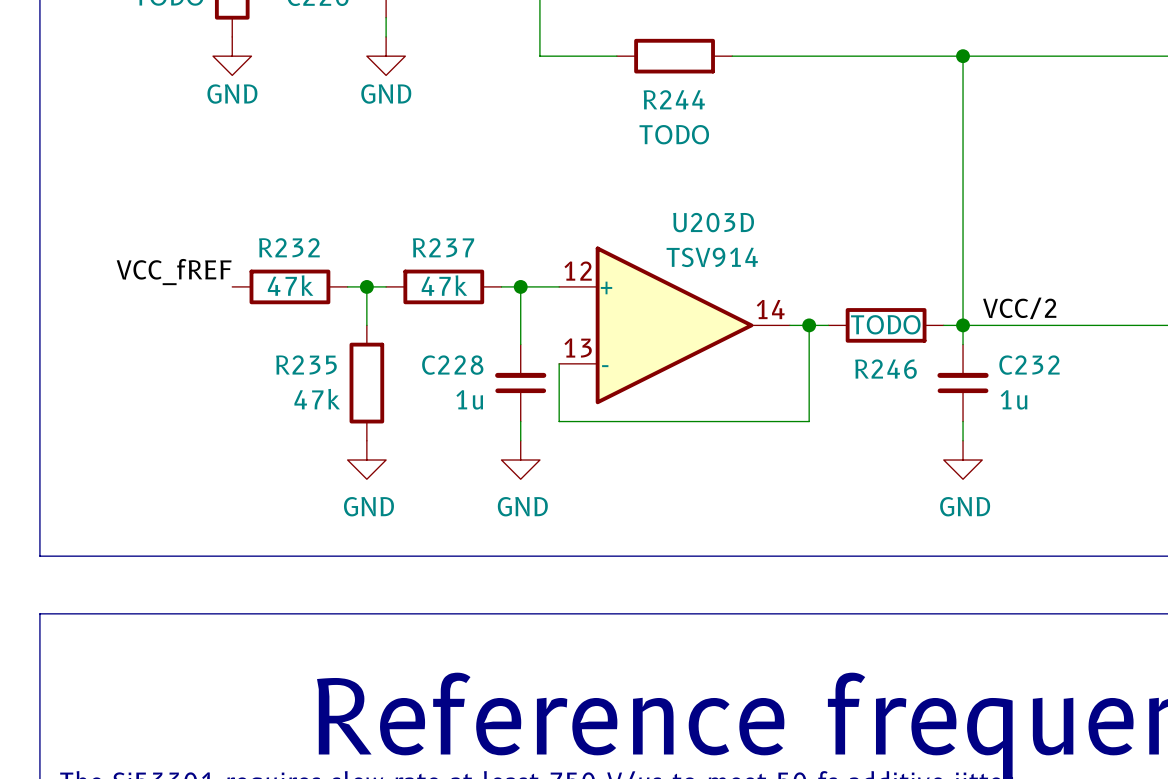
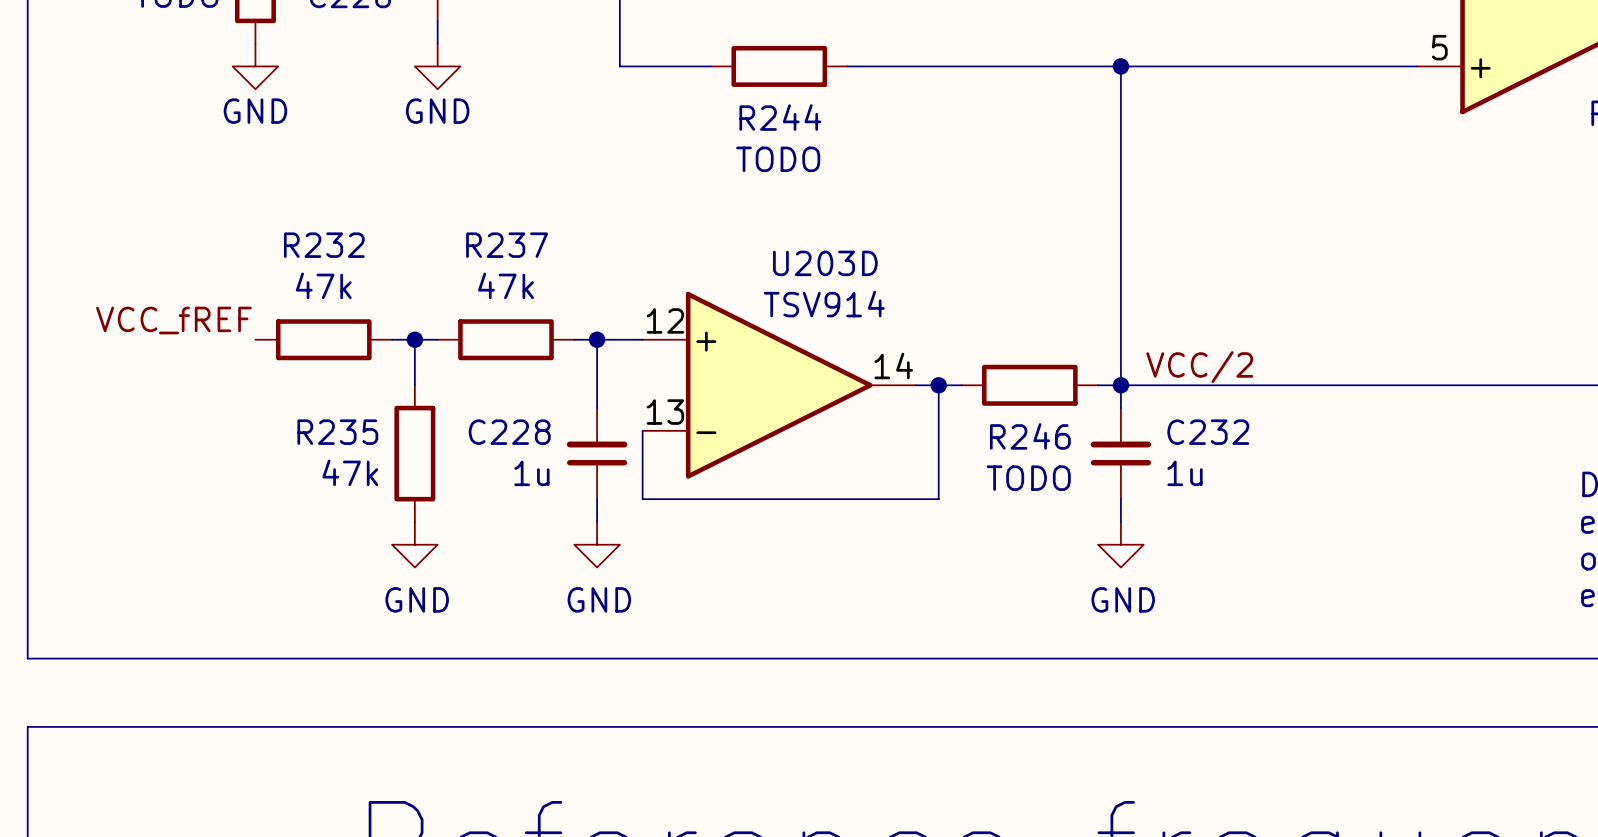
R232 name position: R232 (289, 247) -> R232 (324, 245)
R237 name position: R237 (443, 247) -> R237 (507, 245)
R232 value position: 47k (290, 285) -> 47k (323, 285)
R237 value position: 47k (444, 285) -> 47k (505, 285)
R246 value position: TODO (885, 324) -> TODO (1028, 478)

